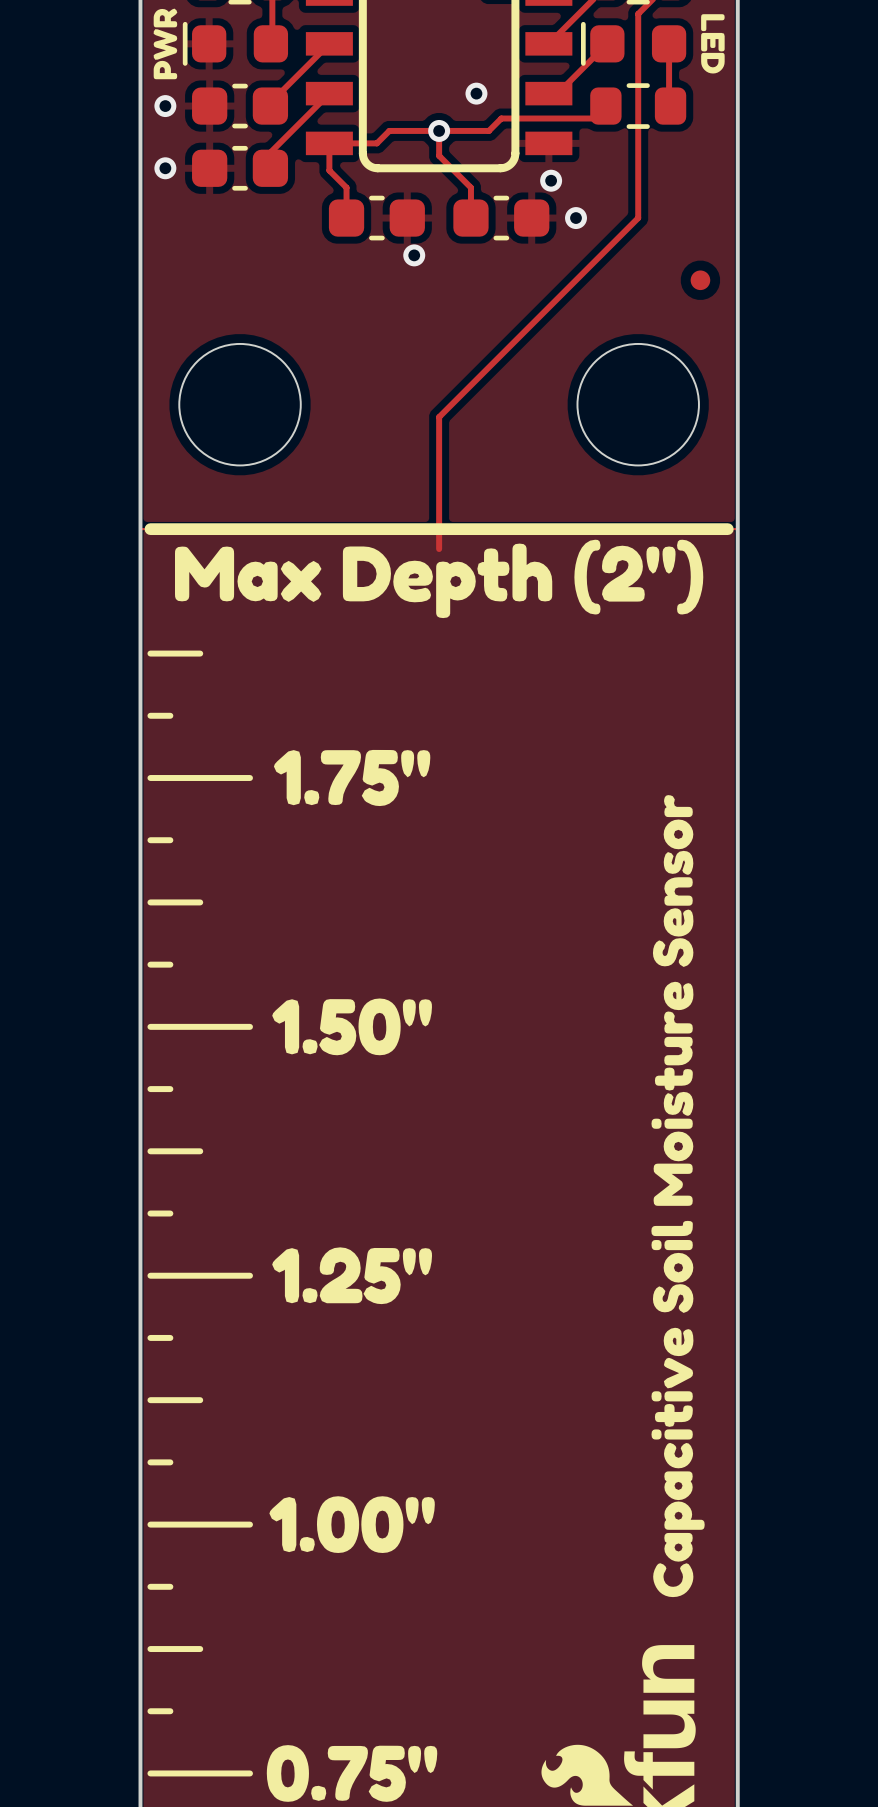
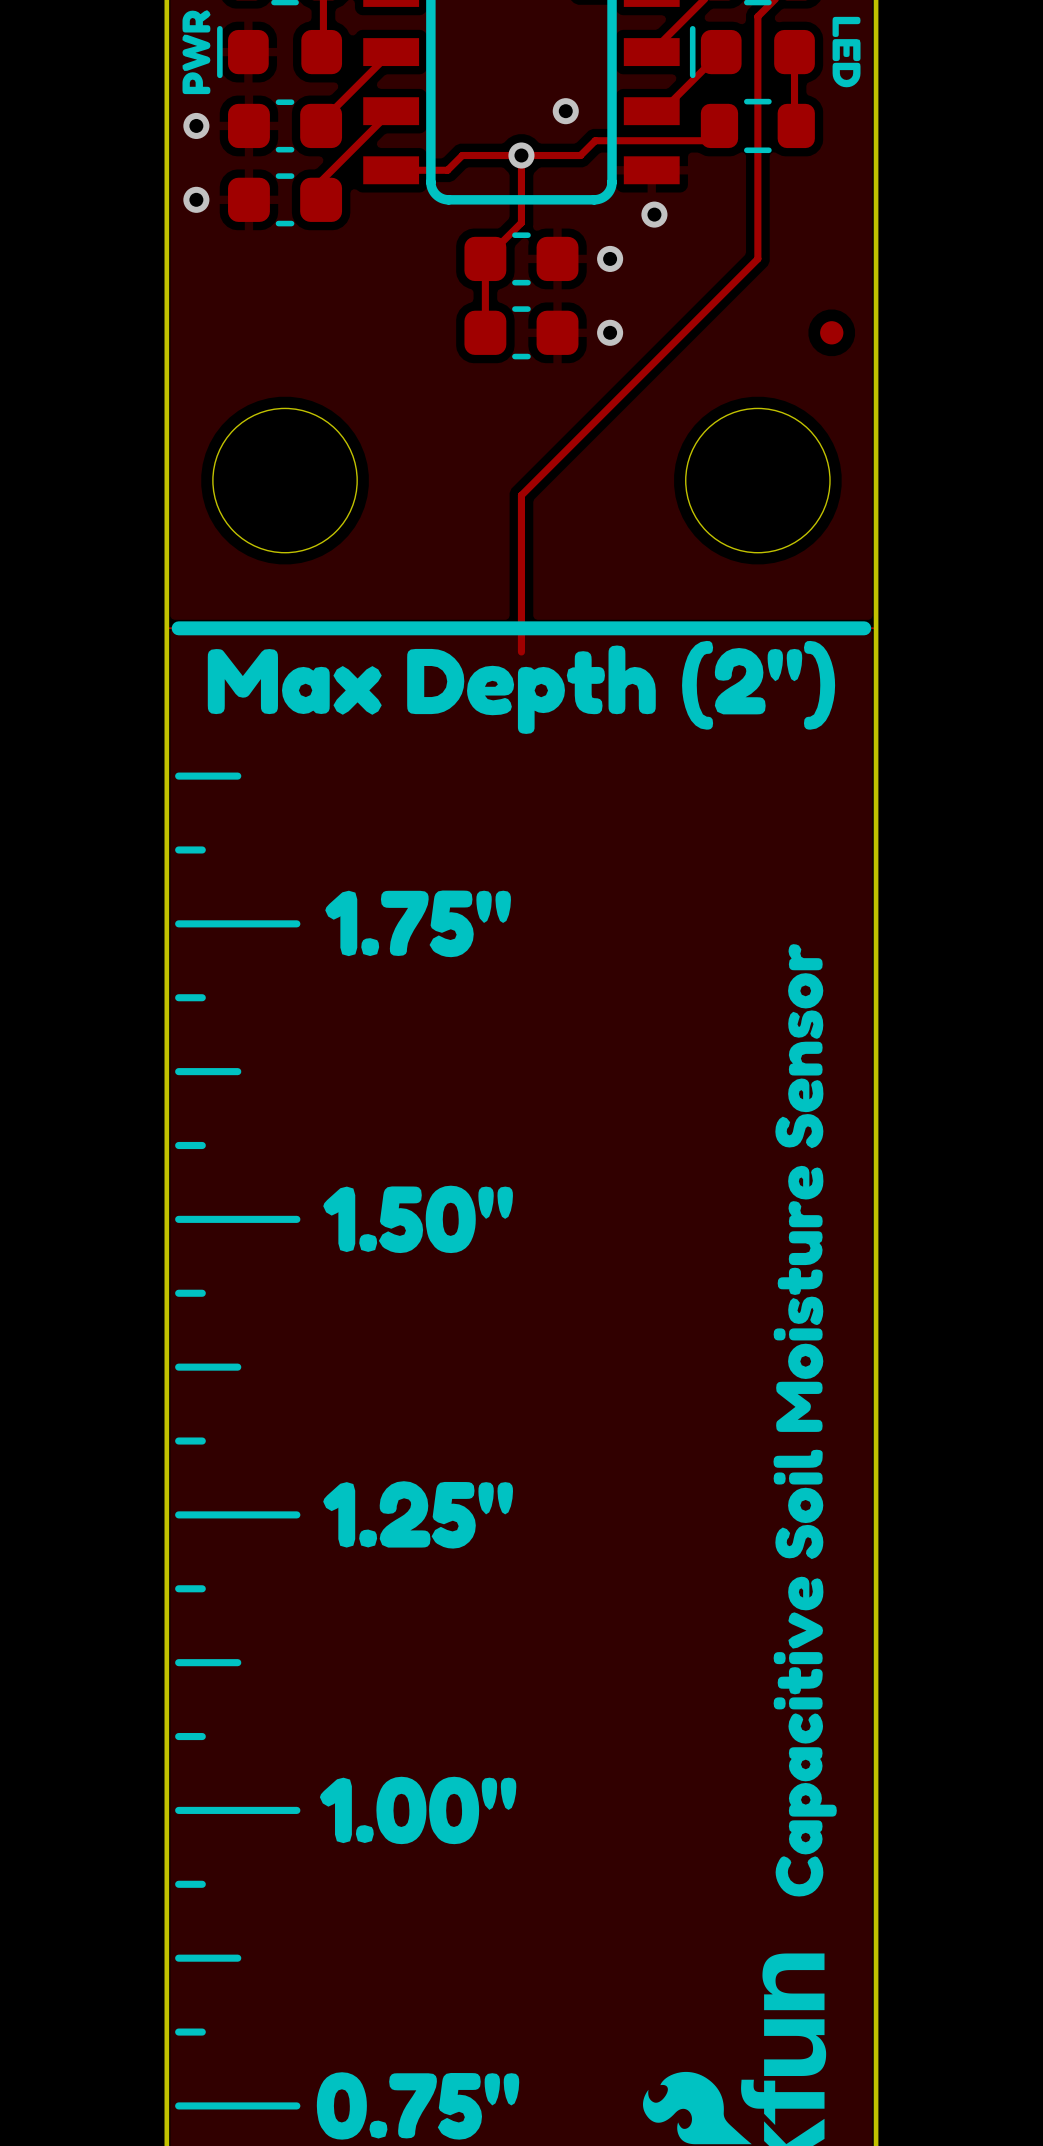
track: (329, 143) (329, 170) (346, 187) (346, 218) -> none
track: (439, 155) (470, 187) (470, 218) -> (521, 185) (521, 222) (485, 258) (485, 332) (491, 332)
part: (376, 218) -> none
part: none -> (521, 258)
part: (501, 218) -> none
via: none -> (610, 258)
via: (576, 218) -> none
via: (414, 255) -> none
part: none -> (521, 332)
via: none -> (610, 332)

